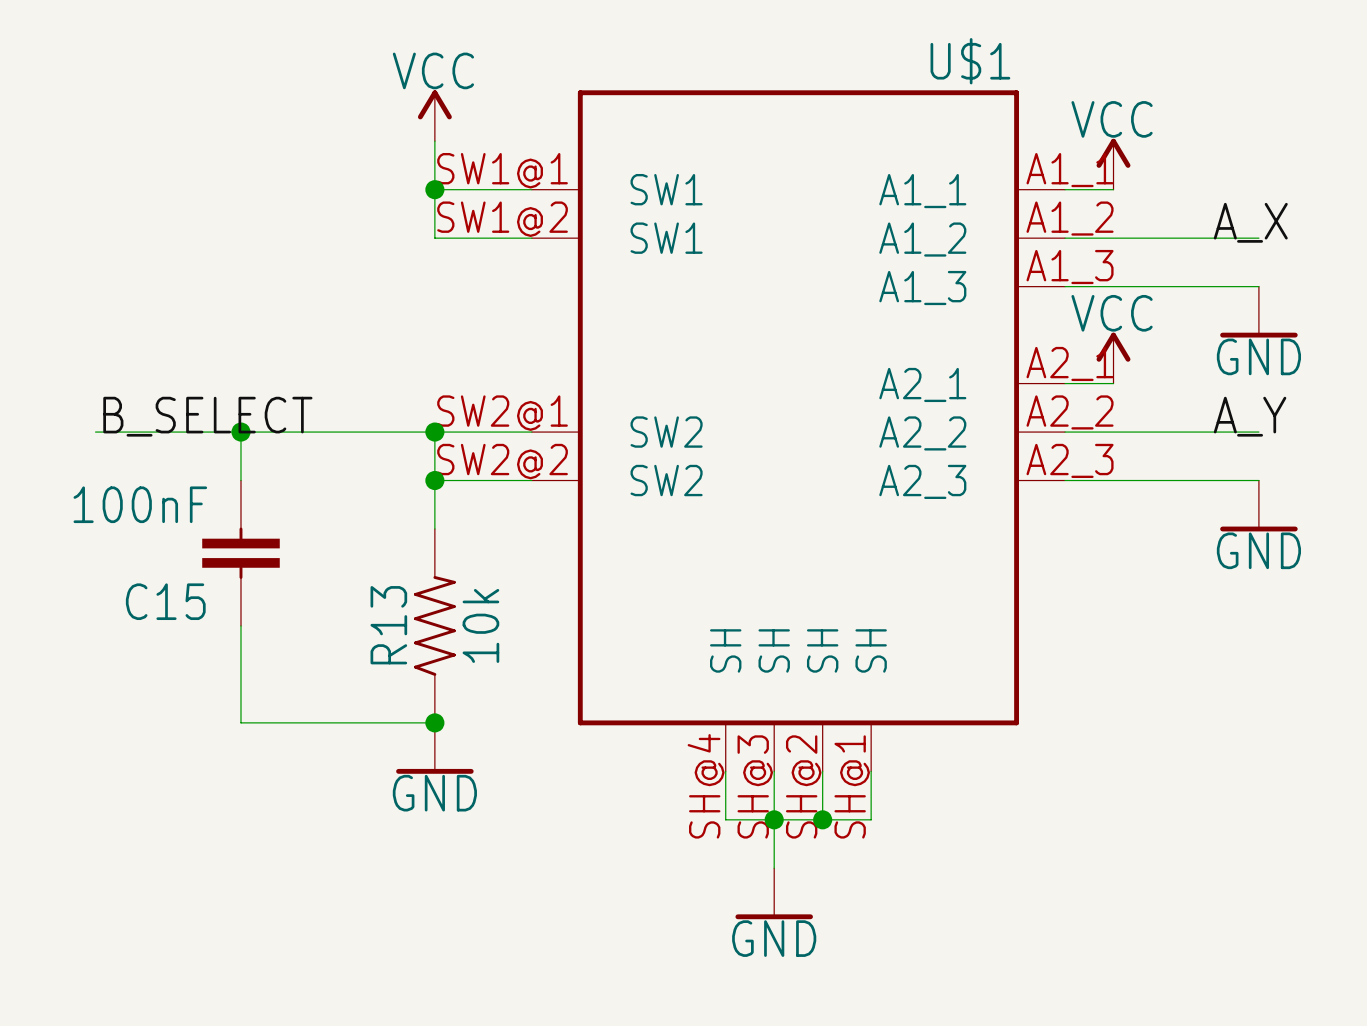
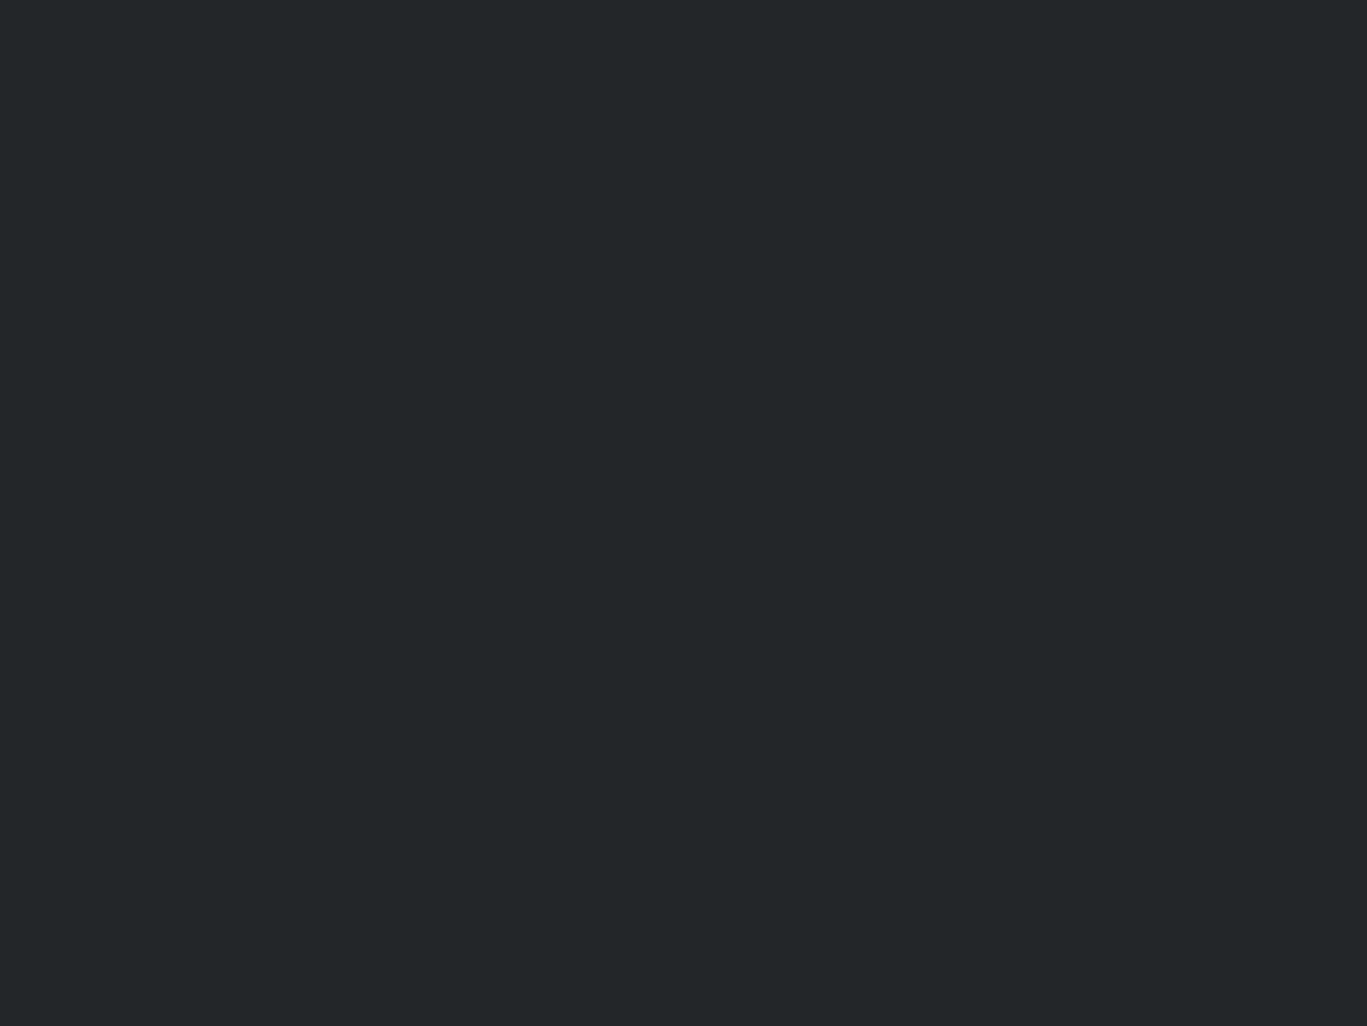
power symbol: VCC (434, 115) -> none
wire: (434, 141) (434, 238) (531, 238) -> none
power symbol: VCC (1113, 164) -> none
wire: (434, 189) (531, 189) -> none
junction: (434, 189) -> none
wire: (1065, 189) (1113, 189) -> none
label: A_X (1250, 222) -> none
wire: (1065, 238) (1258, 238) -> none
wire: (1065, 286) (1258, 286) -> none
power symbol: GND (1258, 312) -> none
power symbol: VCC (1113, 358) -> none
wire: (1065, 383) (1113, 383) -> none
label: B_SELECT (207, 416) -> none
label: A_Y (1250, 416) -> none
U$1: (798, 430) -> none
wire: (95, 432) (531, 432) -> none
wire: (240, 432) (240, 480) -> none
junction: (240, 432) -> none
wire: (434, 432) (434, 528) -> none
junction: (434, 432) -> none
wire: (1065, 432) (1258, 432) -> none
wire: (434, 480) (531, 480) -> none
junction: (434, 480) -> none
wire: (1065, 480) (1258, 480) -> none
power symbol: GND (1258, 505) -> none
C15: 100nF (240, 553) -> none
wire: (240, 625) (240, 722) (434, 722) -> none
R13: 10k (434, 625) -> none
junction: (434, 722) -> none
power symbol: GND (434, 748) -> none
wire: (725, 771) (725, 819) (871, 819) (871, 771) -> none
wire: (774, 771) (774, 868) -> none
wire: (822, 771) (822, 819) -> none
junction: (774, 819) -> none
junction: (822, 819) -> none
power symbol: GND (774, 893) -> none

